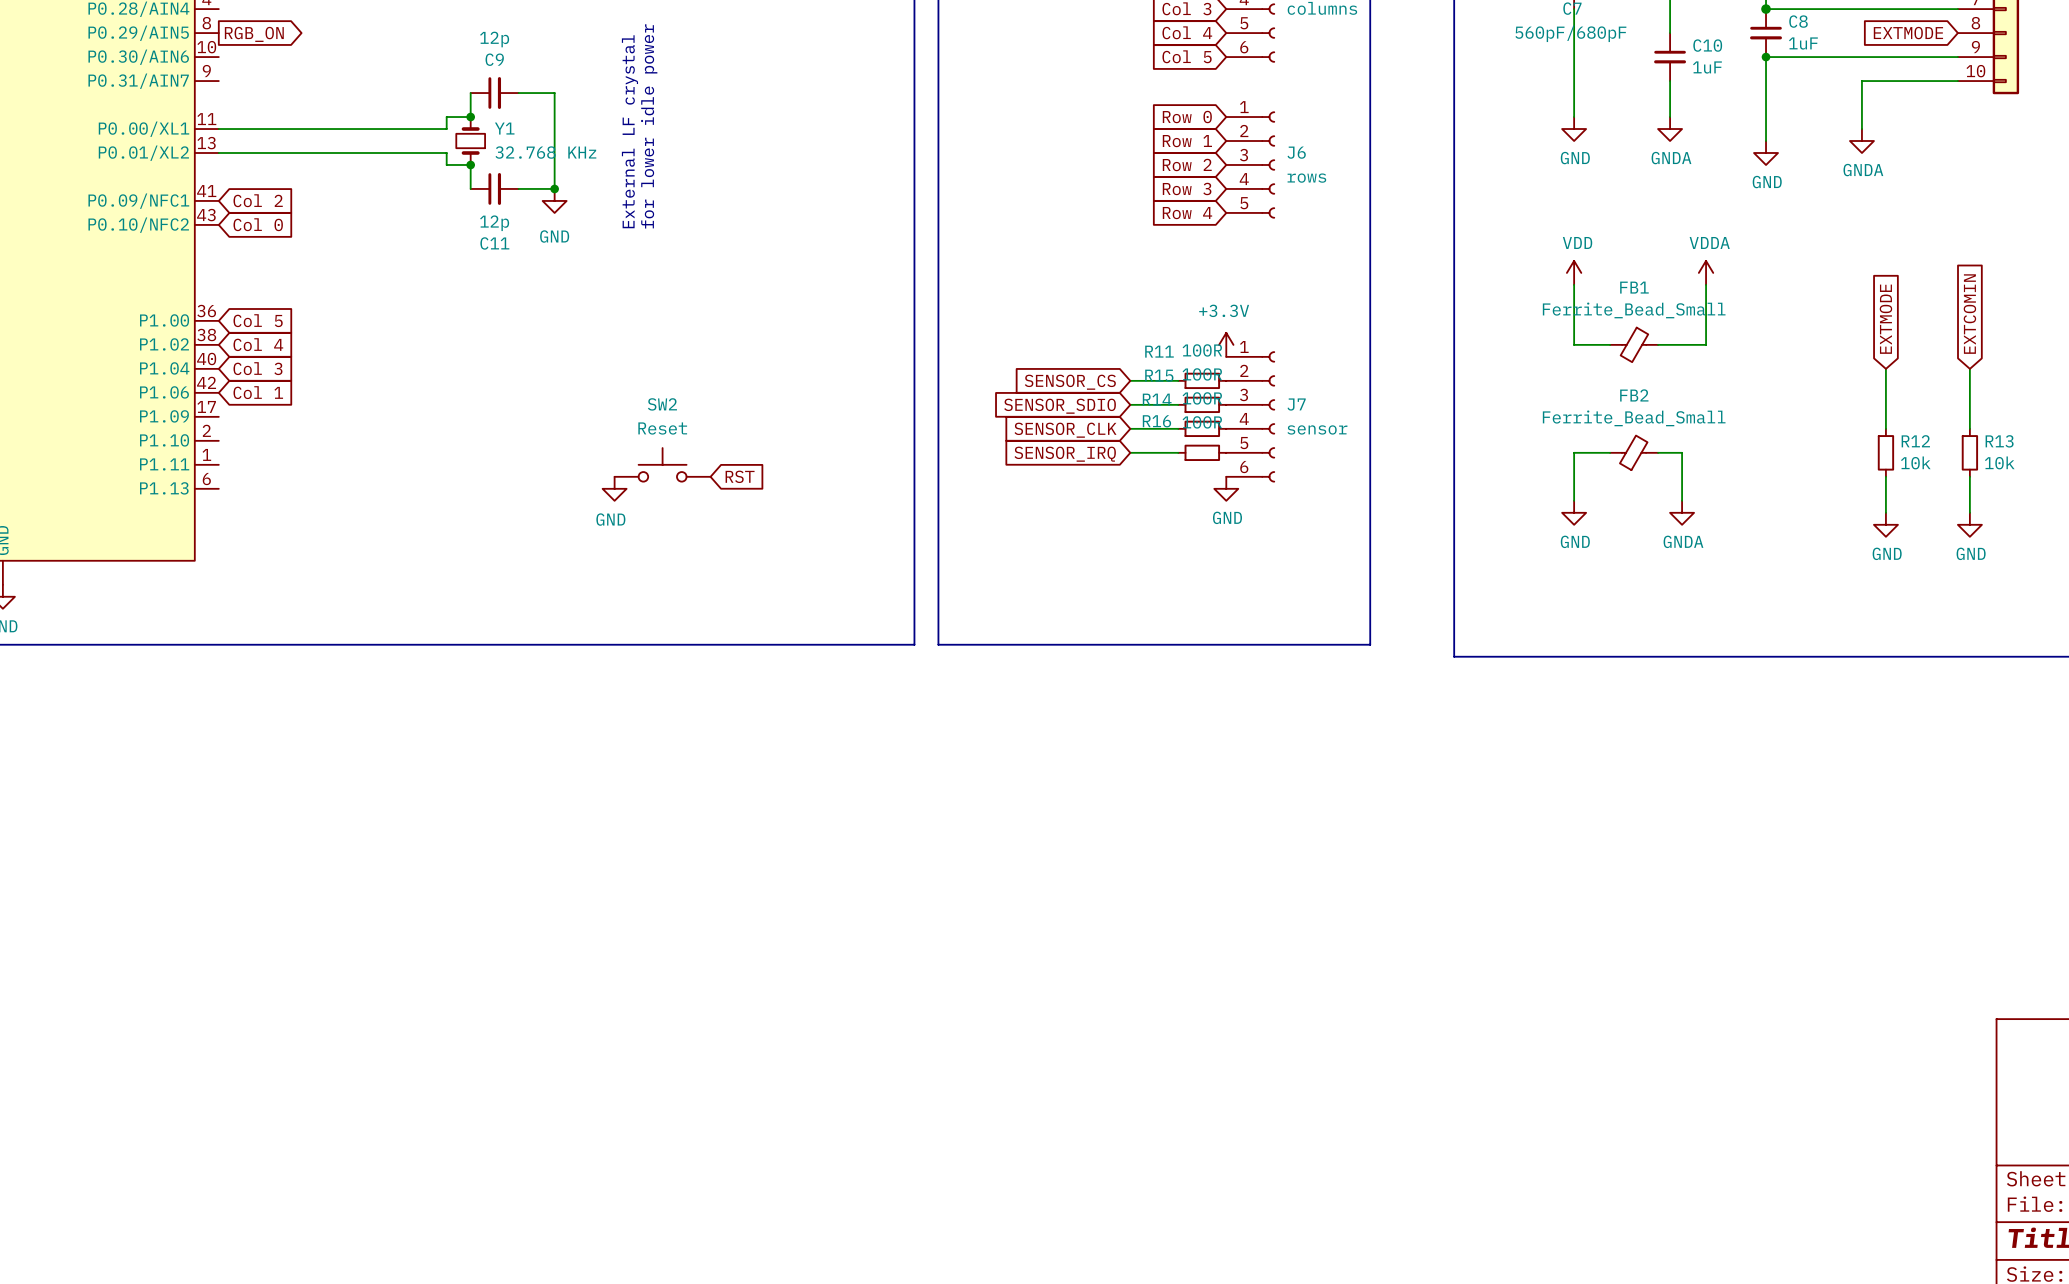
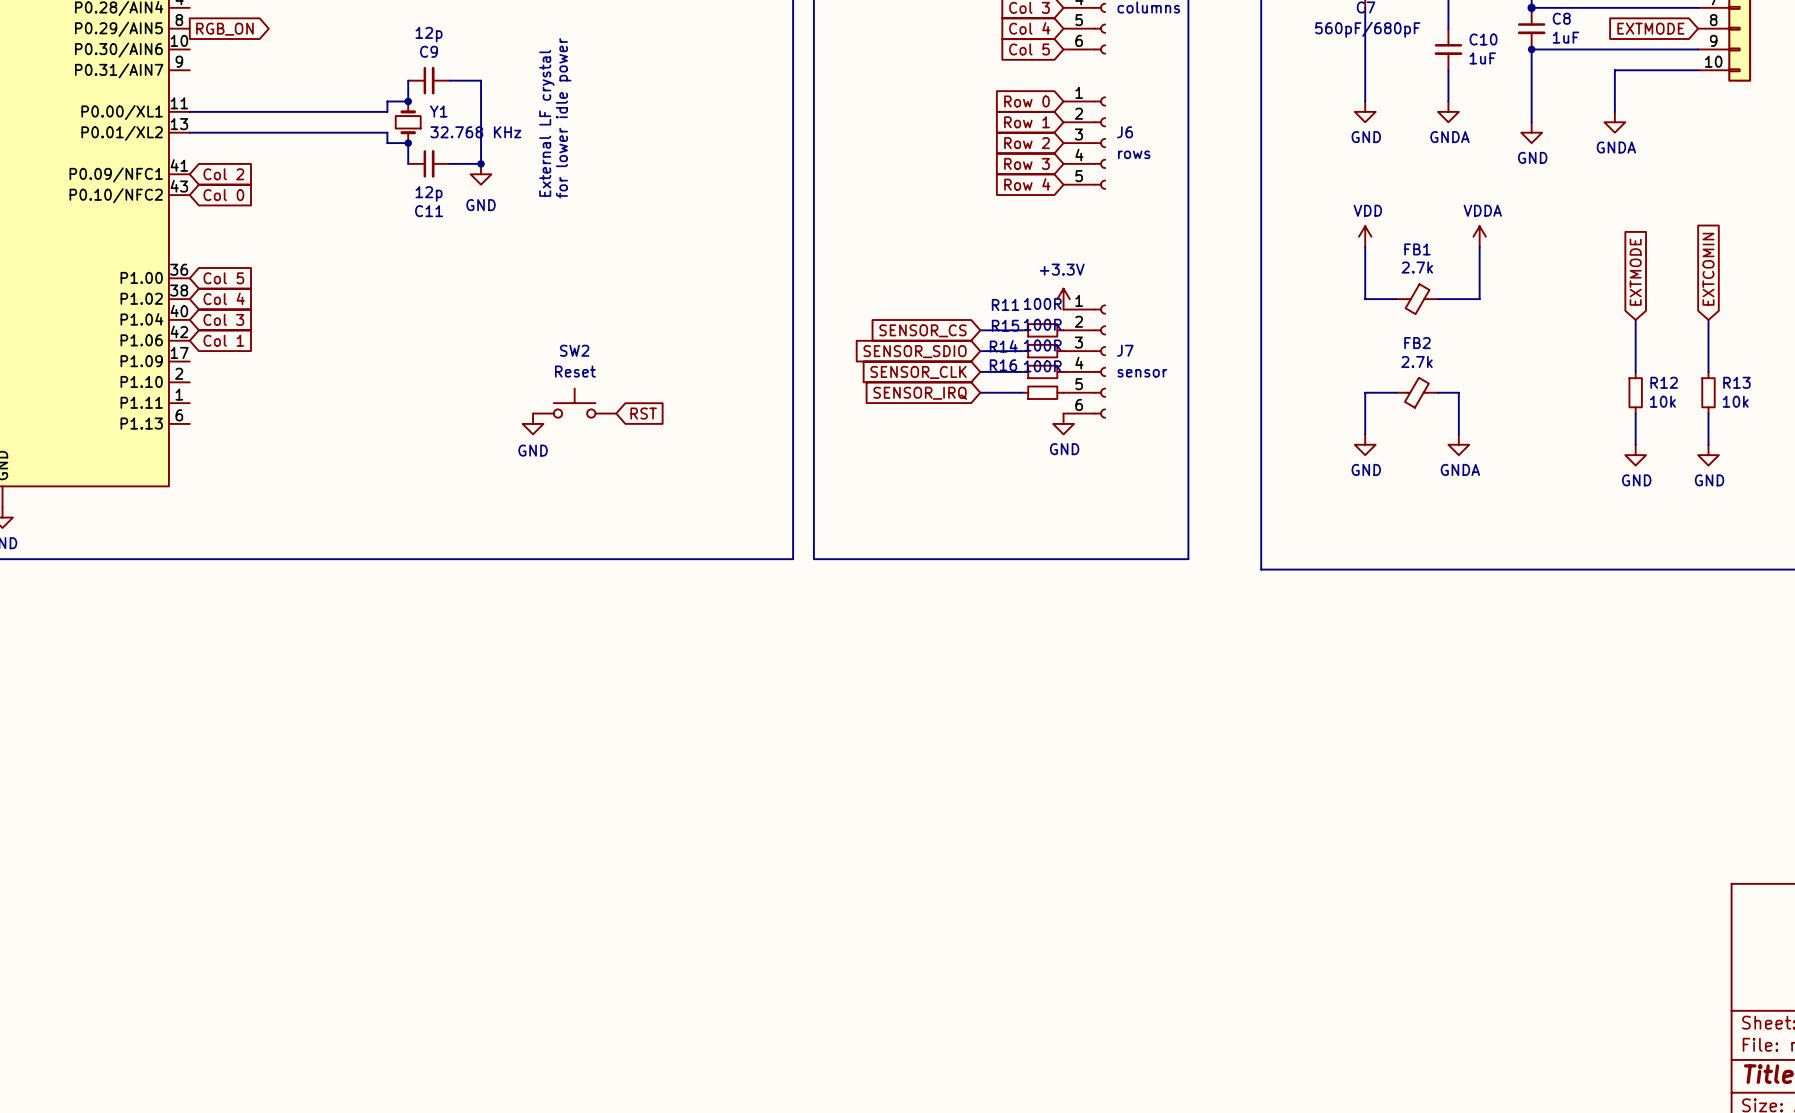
FB1 value: Ferrite_Bead_Small (1634, 310) -> 2.7k (1417, 267)
FB2 value: Ferrite_Bead_Small (1634, 418) -> 2.7k (1416, 361)

